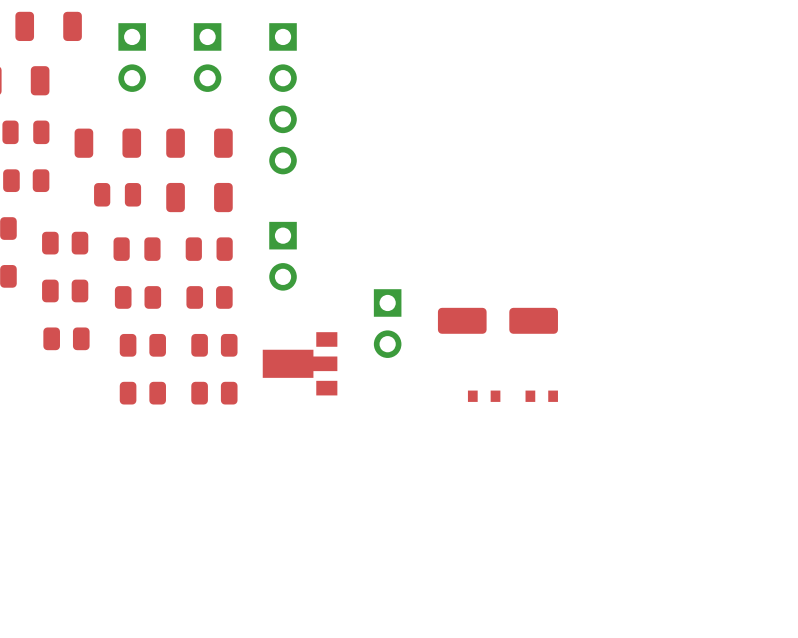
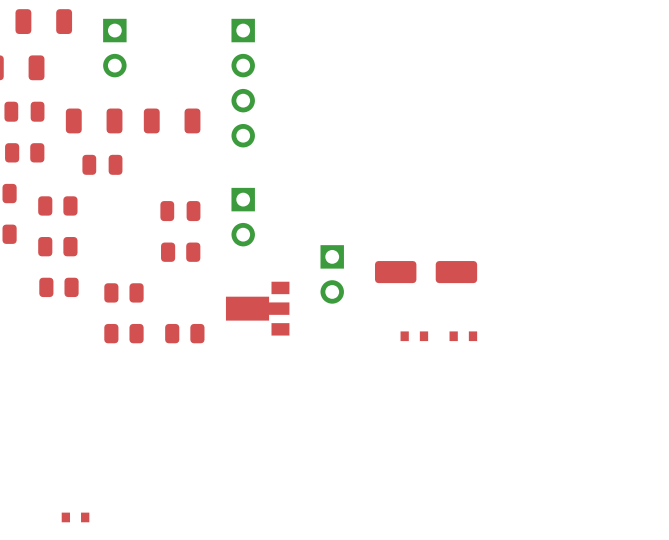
part: (207, 57) -> none
part: (199, 197) -> none
part: (137, 249) -> none
part: (138, 297) -> none
part: (214, 345) -> none
part: none -> (75, 517)

